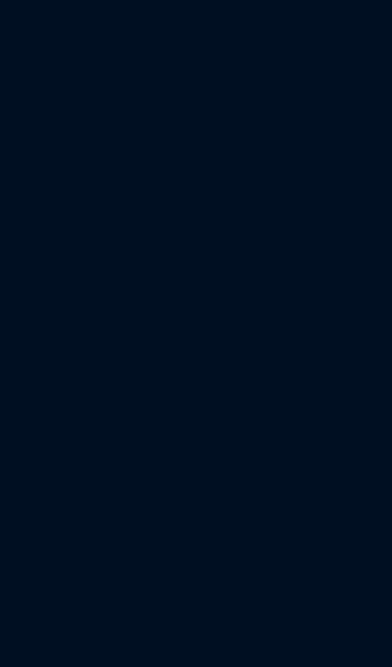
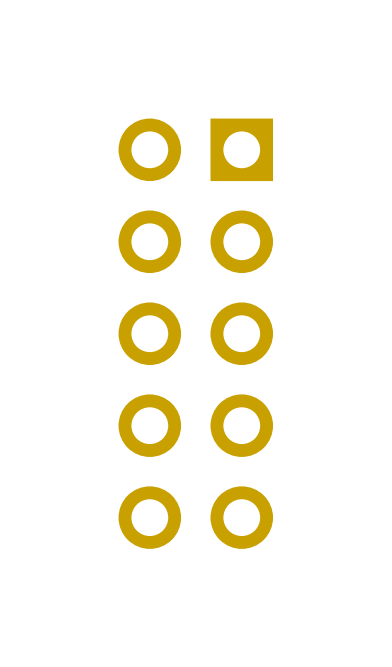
part: none -> (195, 333)

